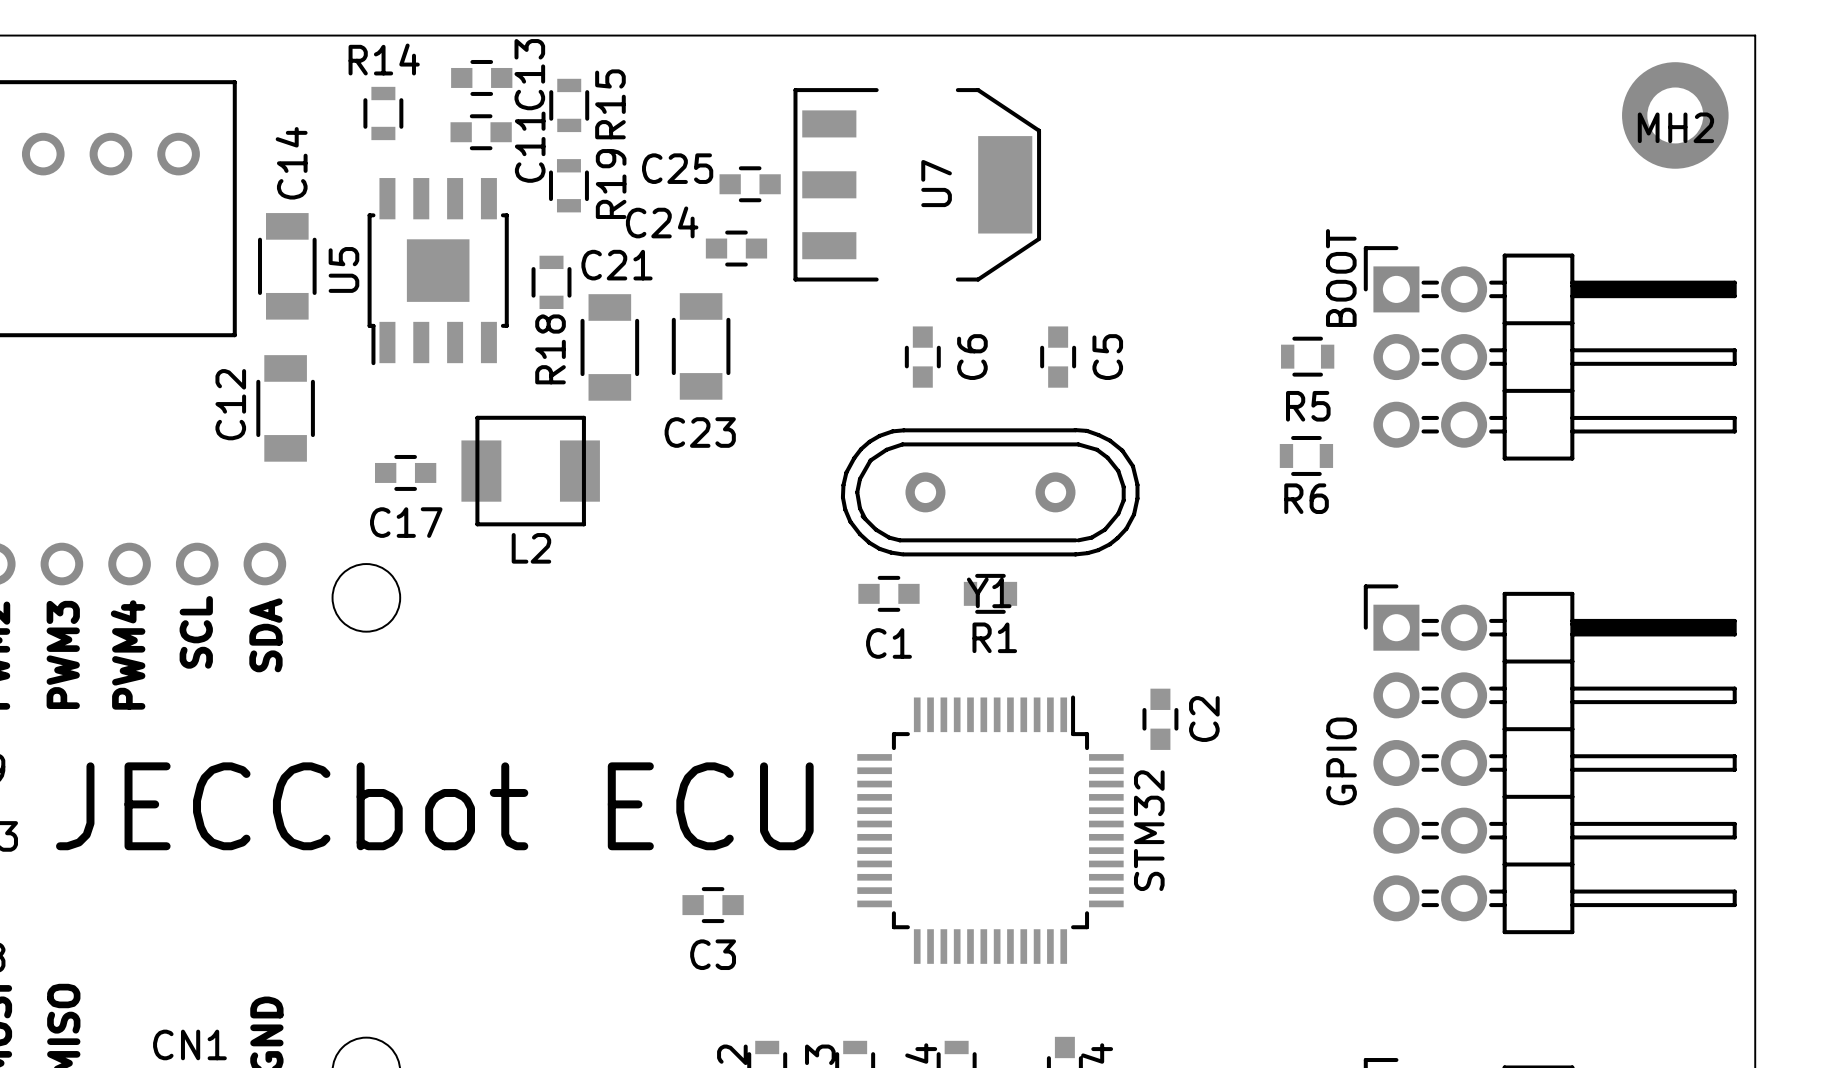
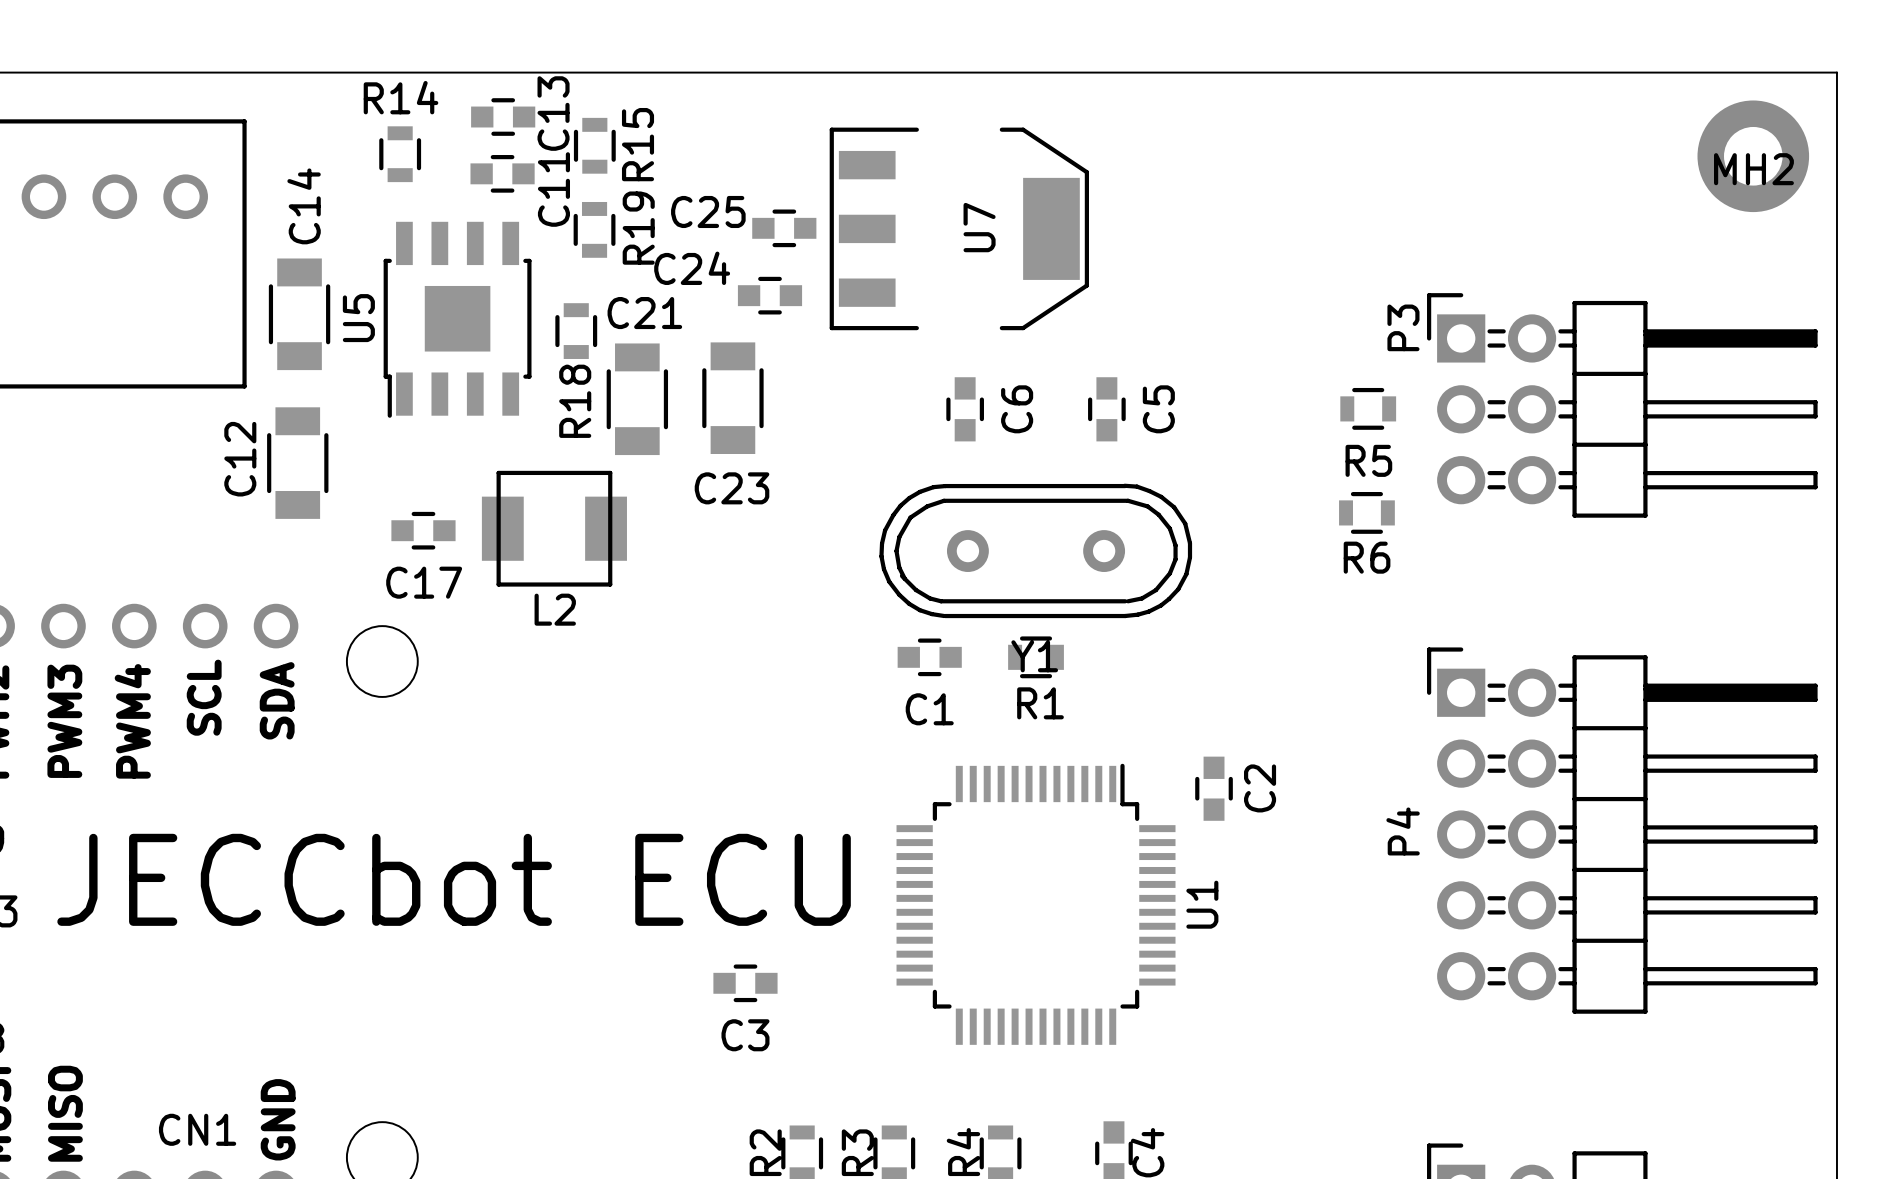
BOOT name: BOOT (1341, 278) -> P3 (1403, 327)
GPIO name: GPIO (1341, 761) -> P4 (1403, 831)
STM32 name: STM32 (1149, 830) -> U1 (1202, 904)

